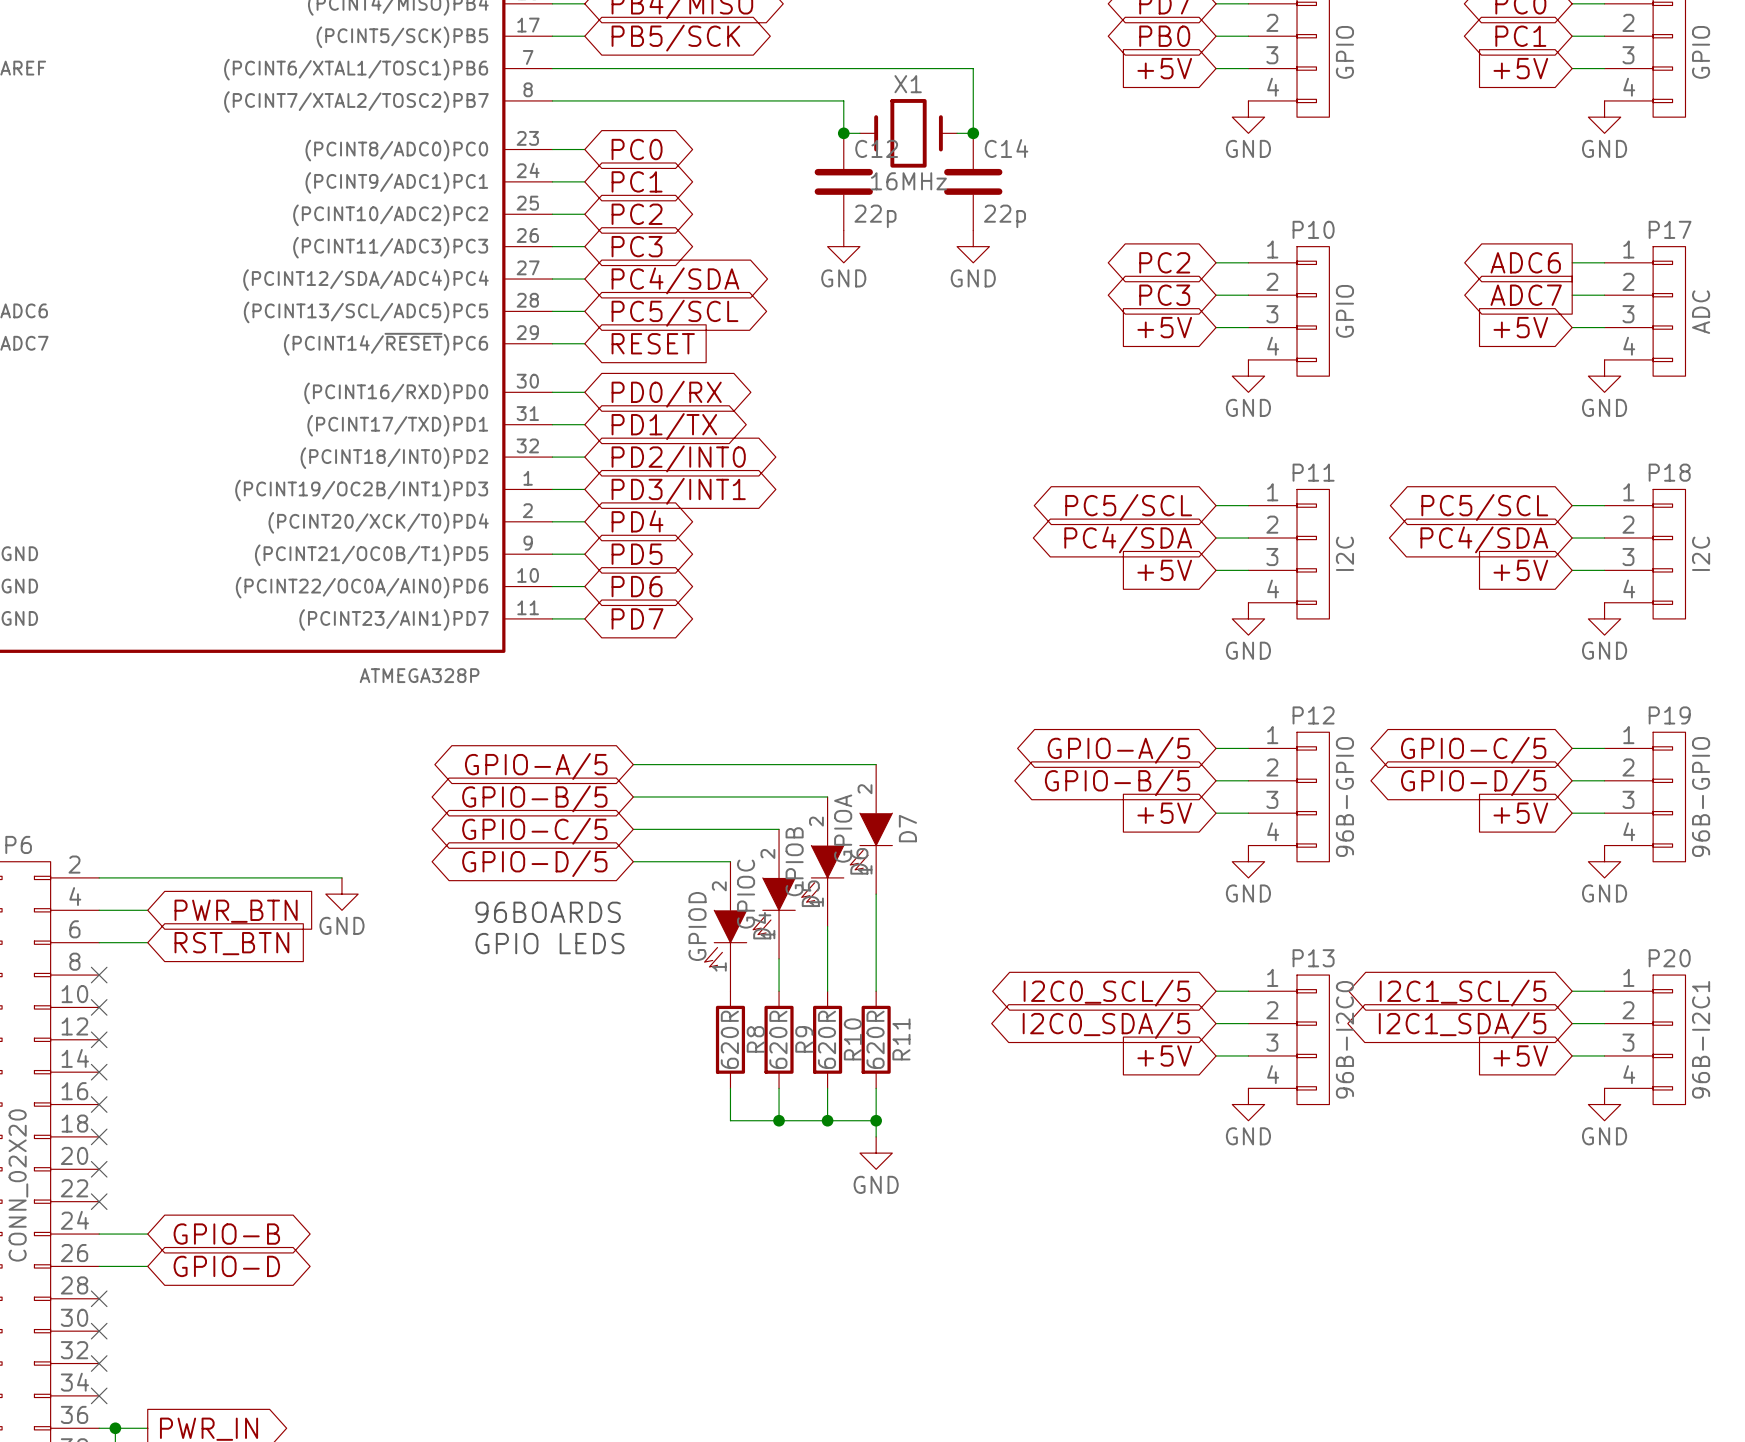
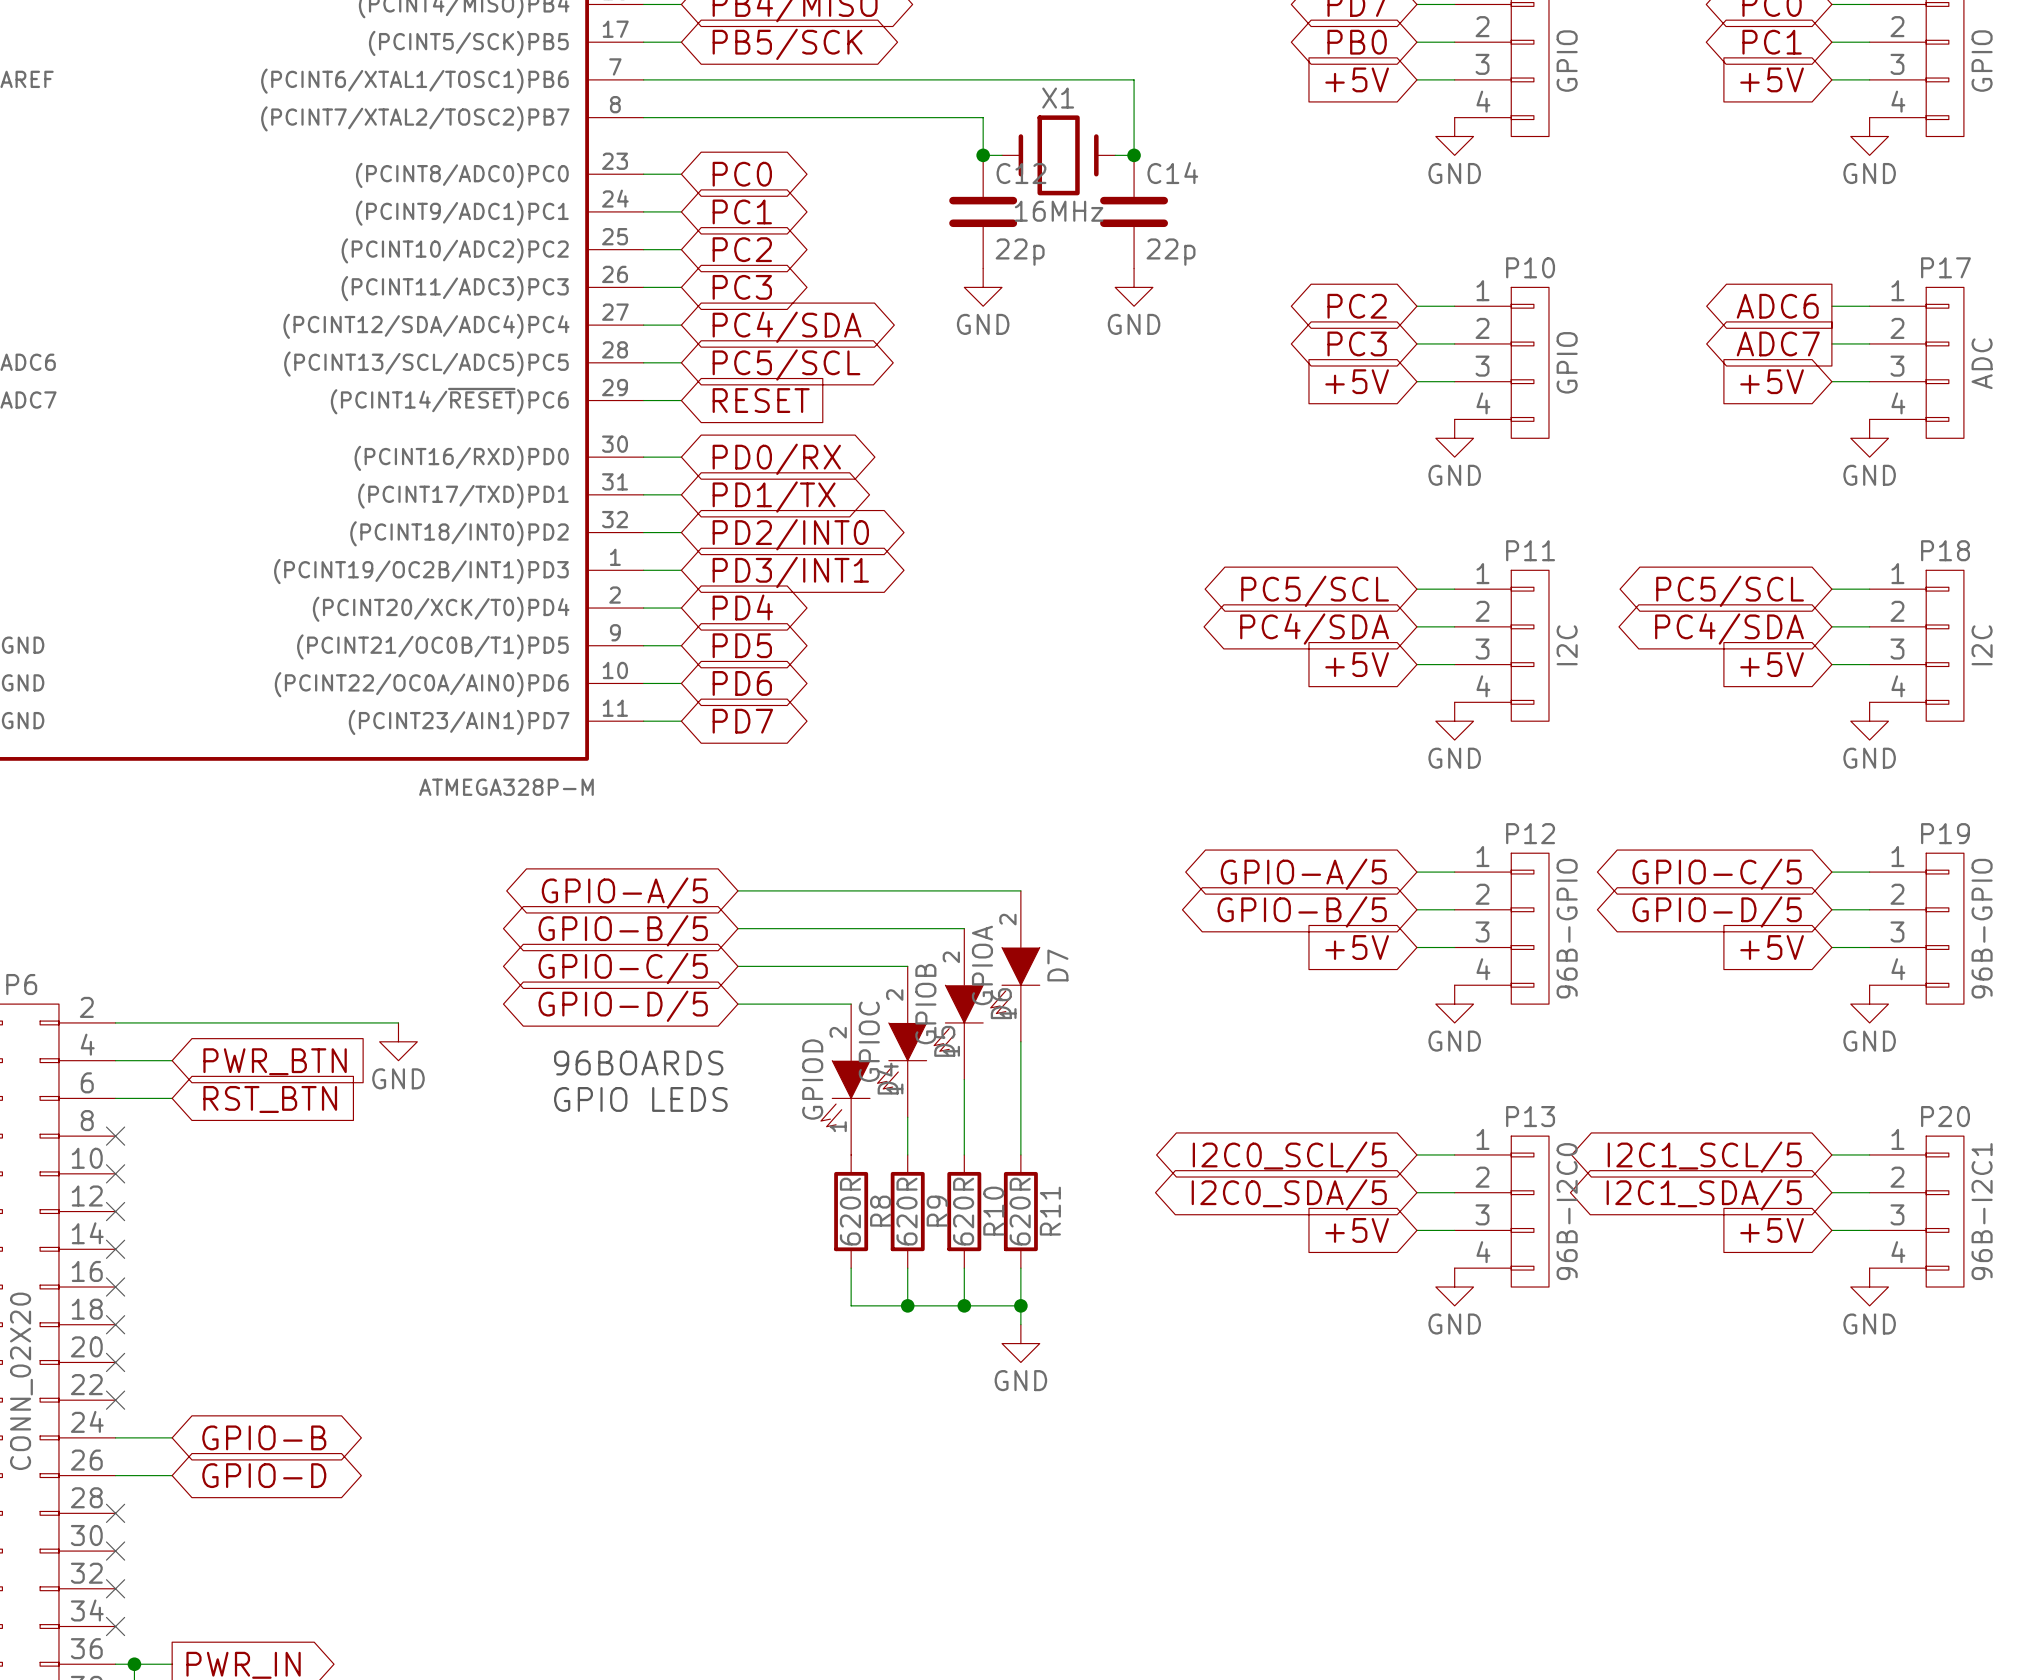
part value: ATMEGA328P (419, 675) -> ATMEGA328P-M (506, 787)

